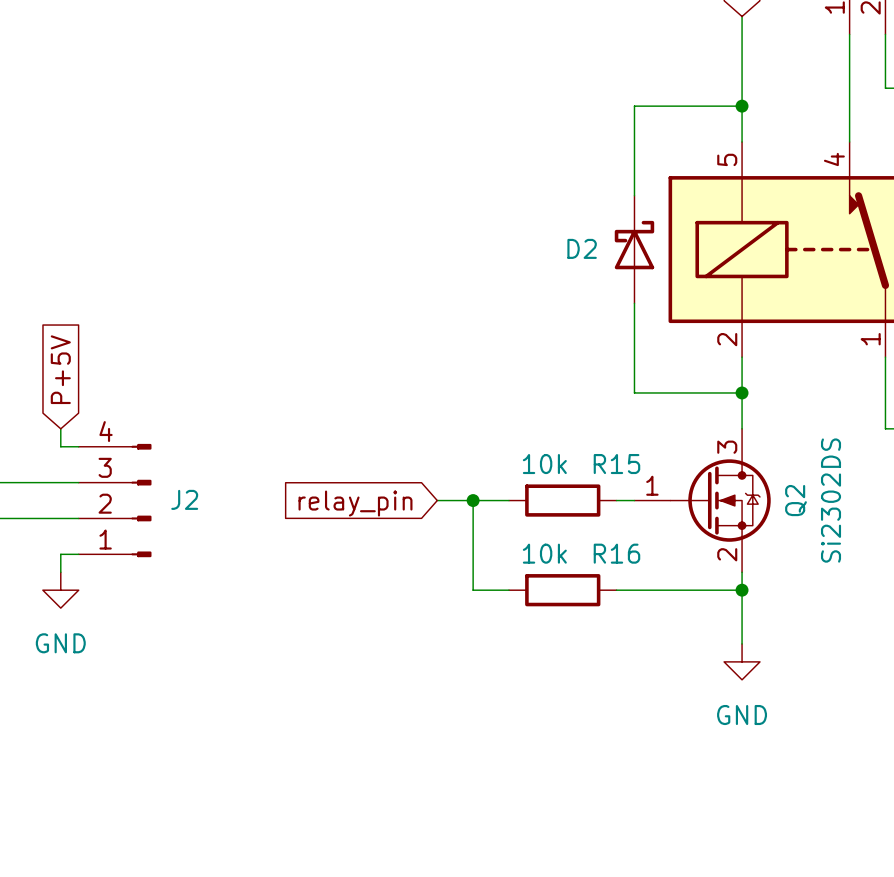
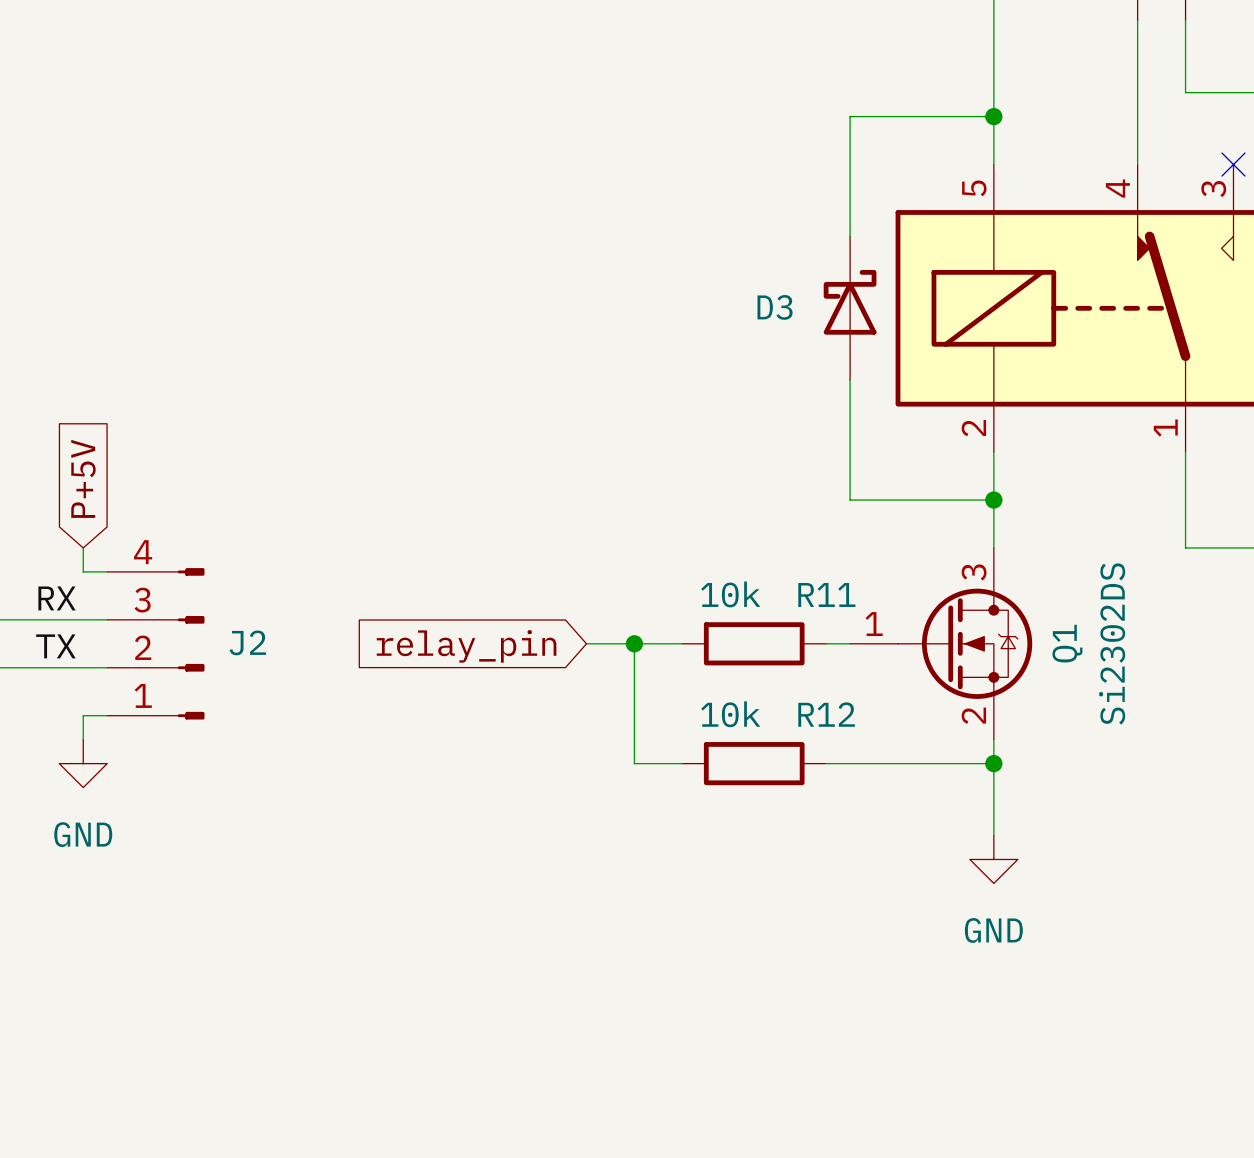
D2 name: D2 (582, 248) -> D3 (775, 307)
R15 name: R15 (616, 464) -> R11 (826, 594)
label: none -> RX (57, 598)
Q2 name: Q2 (796, 500) -> Q1 (1067, 643)
label: none -> TX (55, 646)
R16 name: R16 (616, 553) -> R12 (826, 714)

